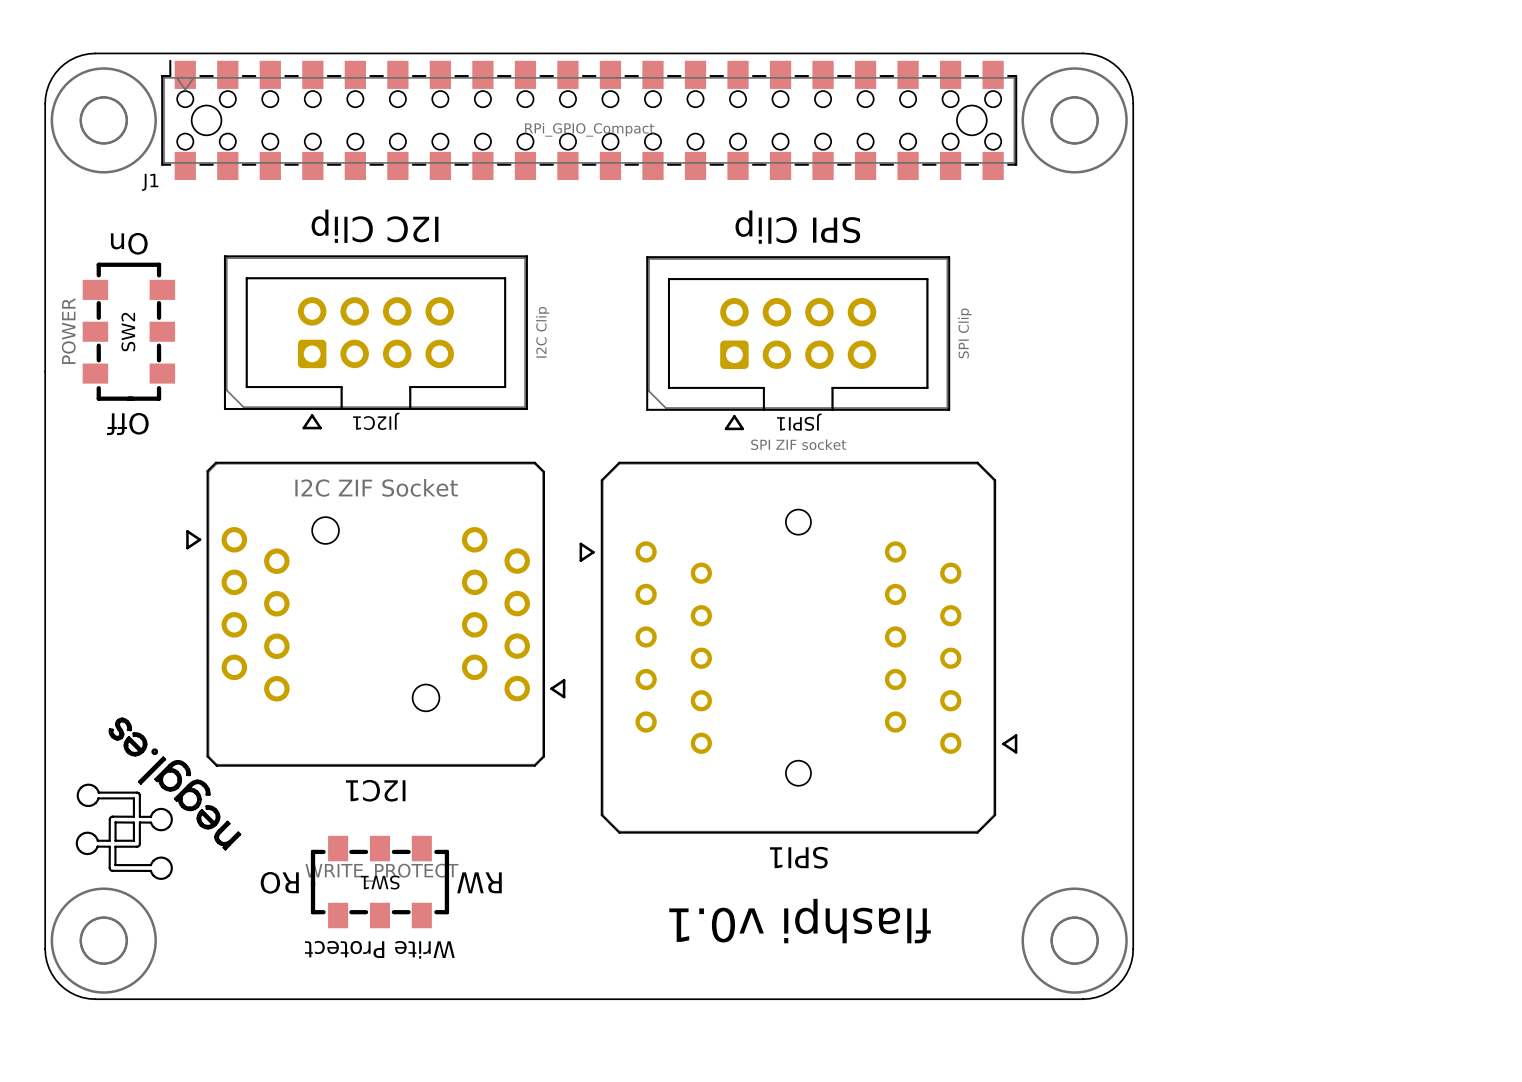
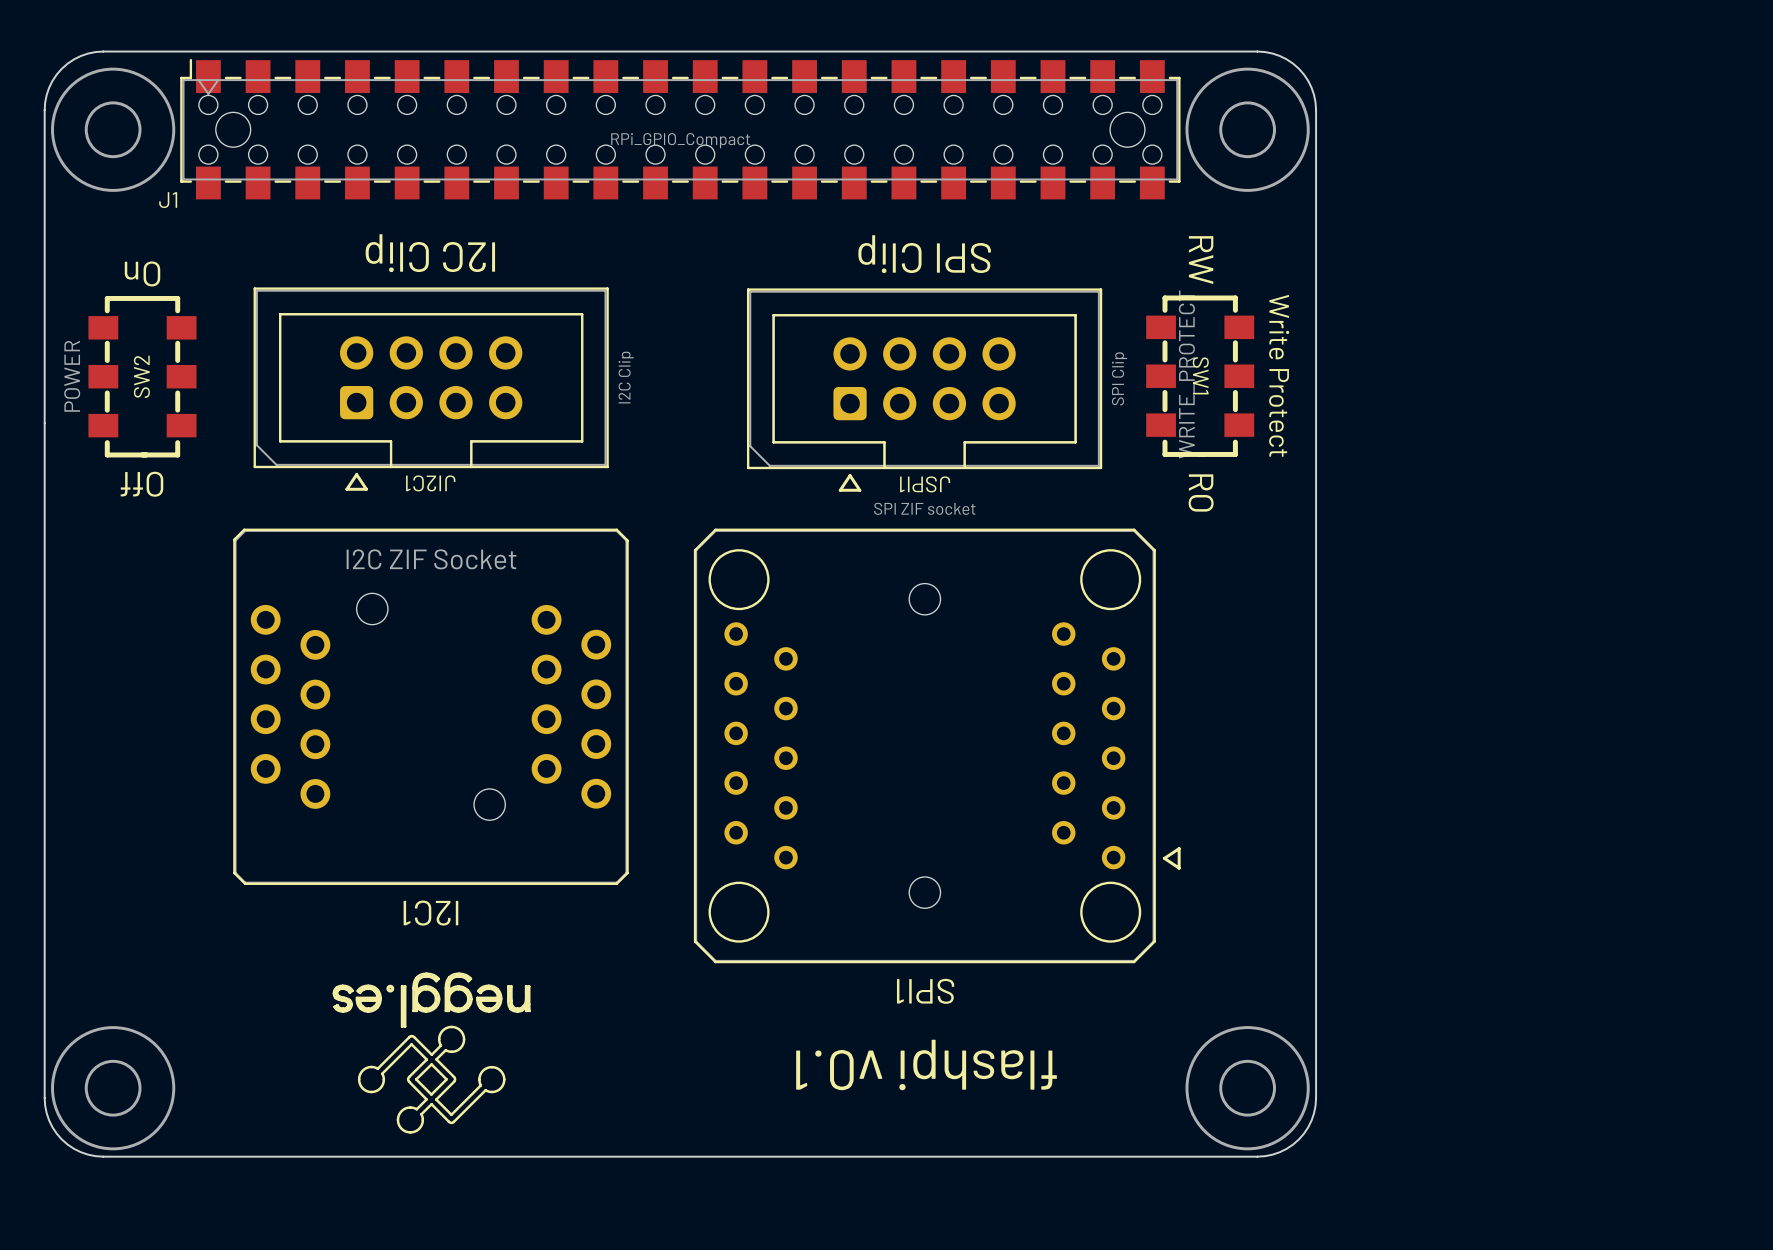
I2C1 footprint: [186, 461, 566, 767] -> [233, 528, 629, 885]
SPI1 footprint: [579, 461, 1018, 834] -> [693, 528, 1181, 964]
drawing: [75, 717, 242, 880] -> none
drawing: none -> [332, 972, 531, 1134]
SW1 rotation: 0° (379, 882) -> 90° counterclockwise (1200, 376)
SW1 position: (379, 882) -> (1200, 376)

